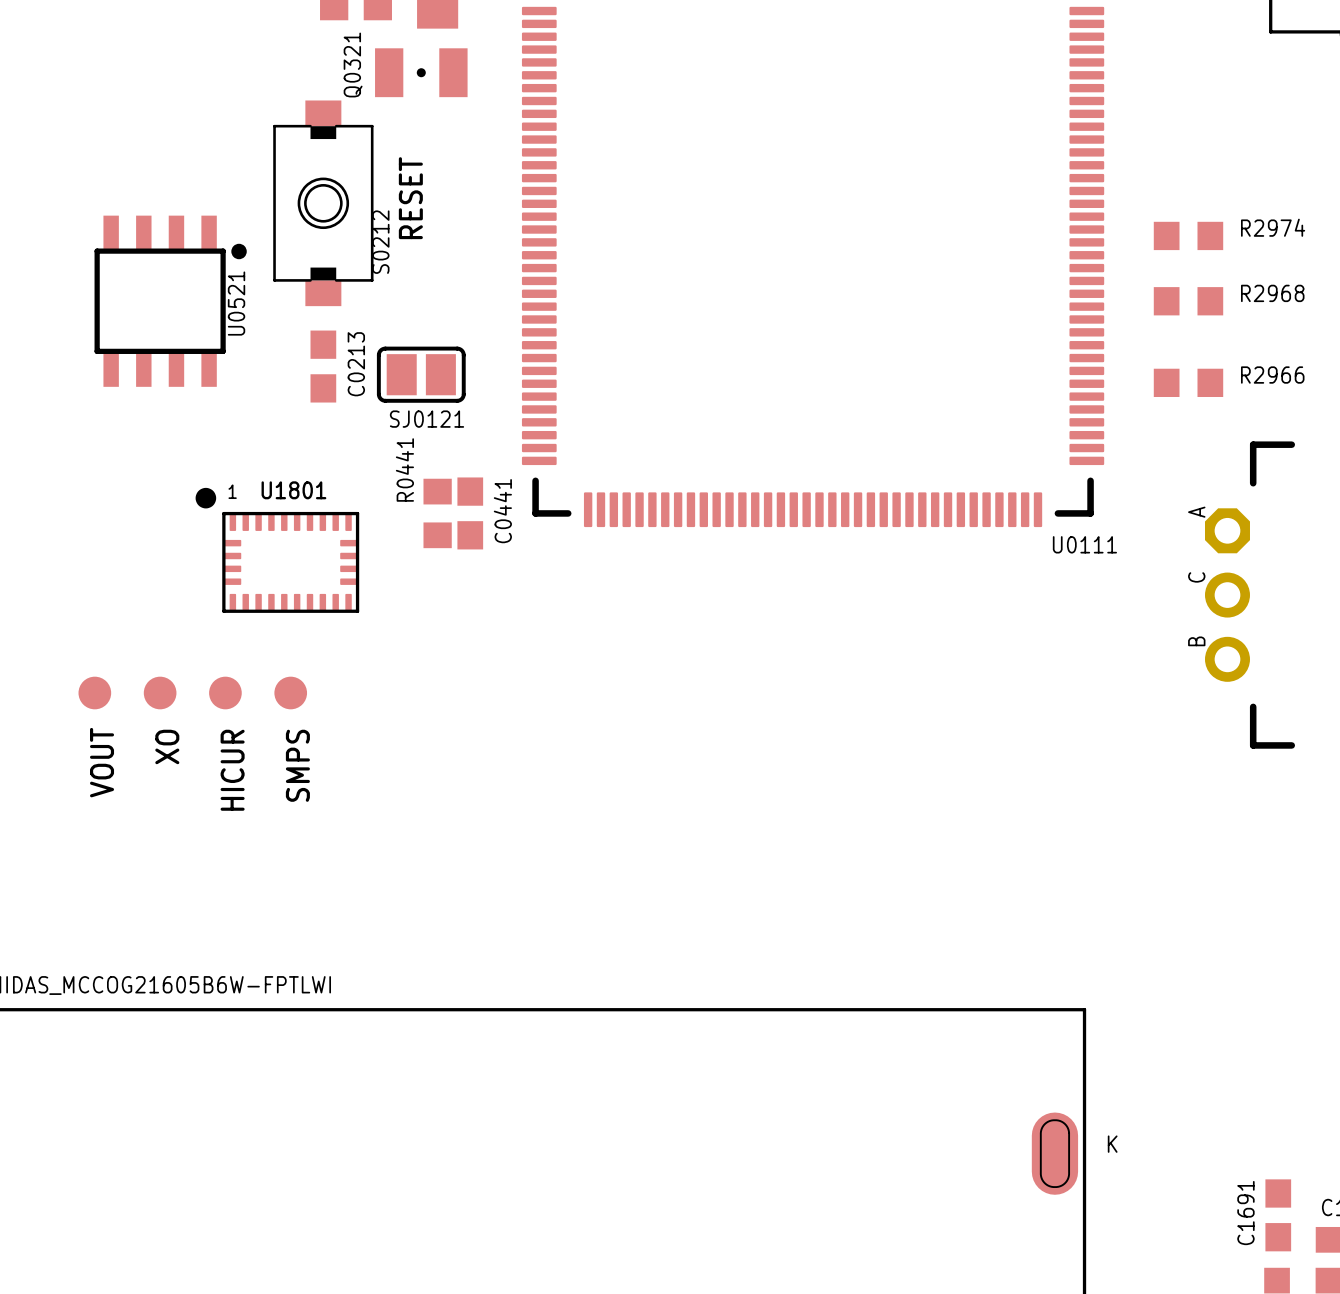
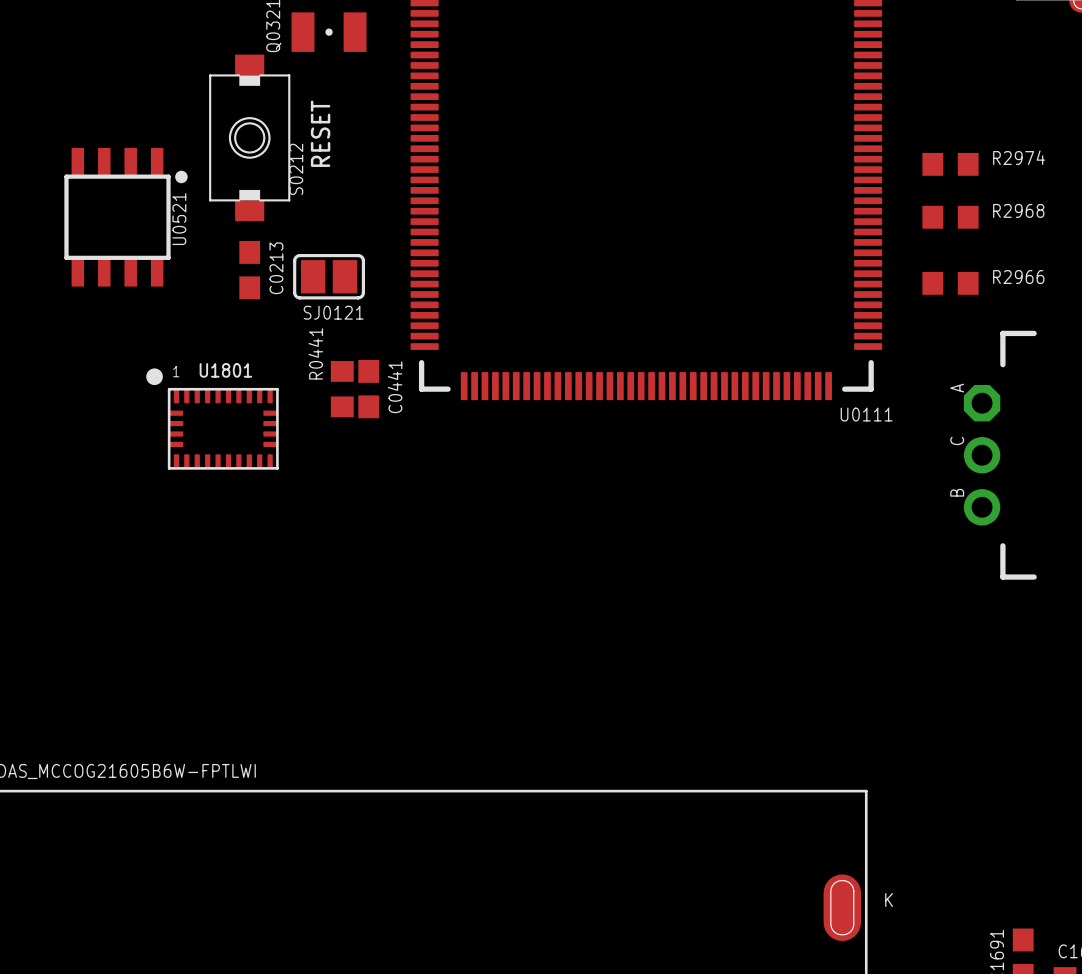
part: (94, 693) -> none
part: (160, 693) -> none
part: (225, 693) -> none
part: (290, 693) -> none
text: XO (167, 746) -> none
text: VOUT (102, 762) -> none
text: SMPS (297, 765) -> none
text: HICUR (232, 770) -> none

